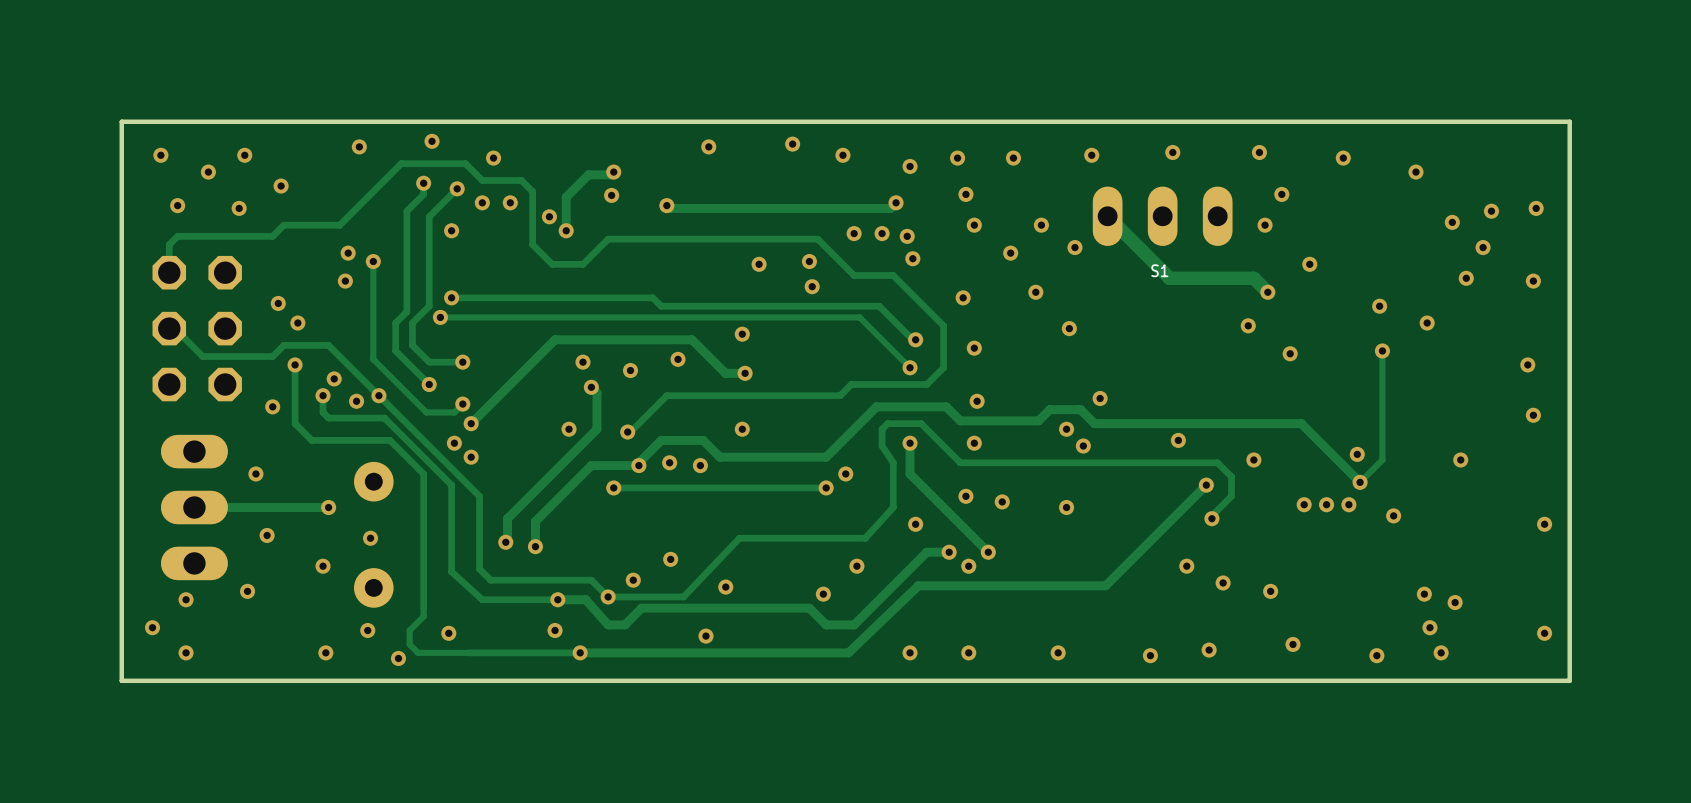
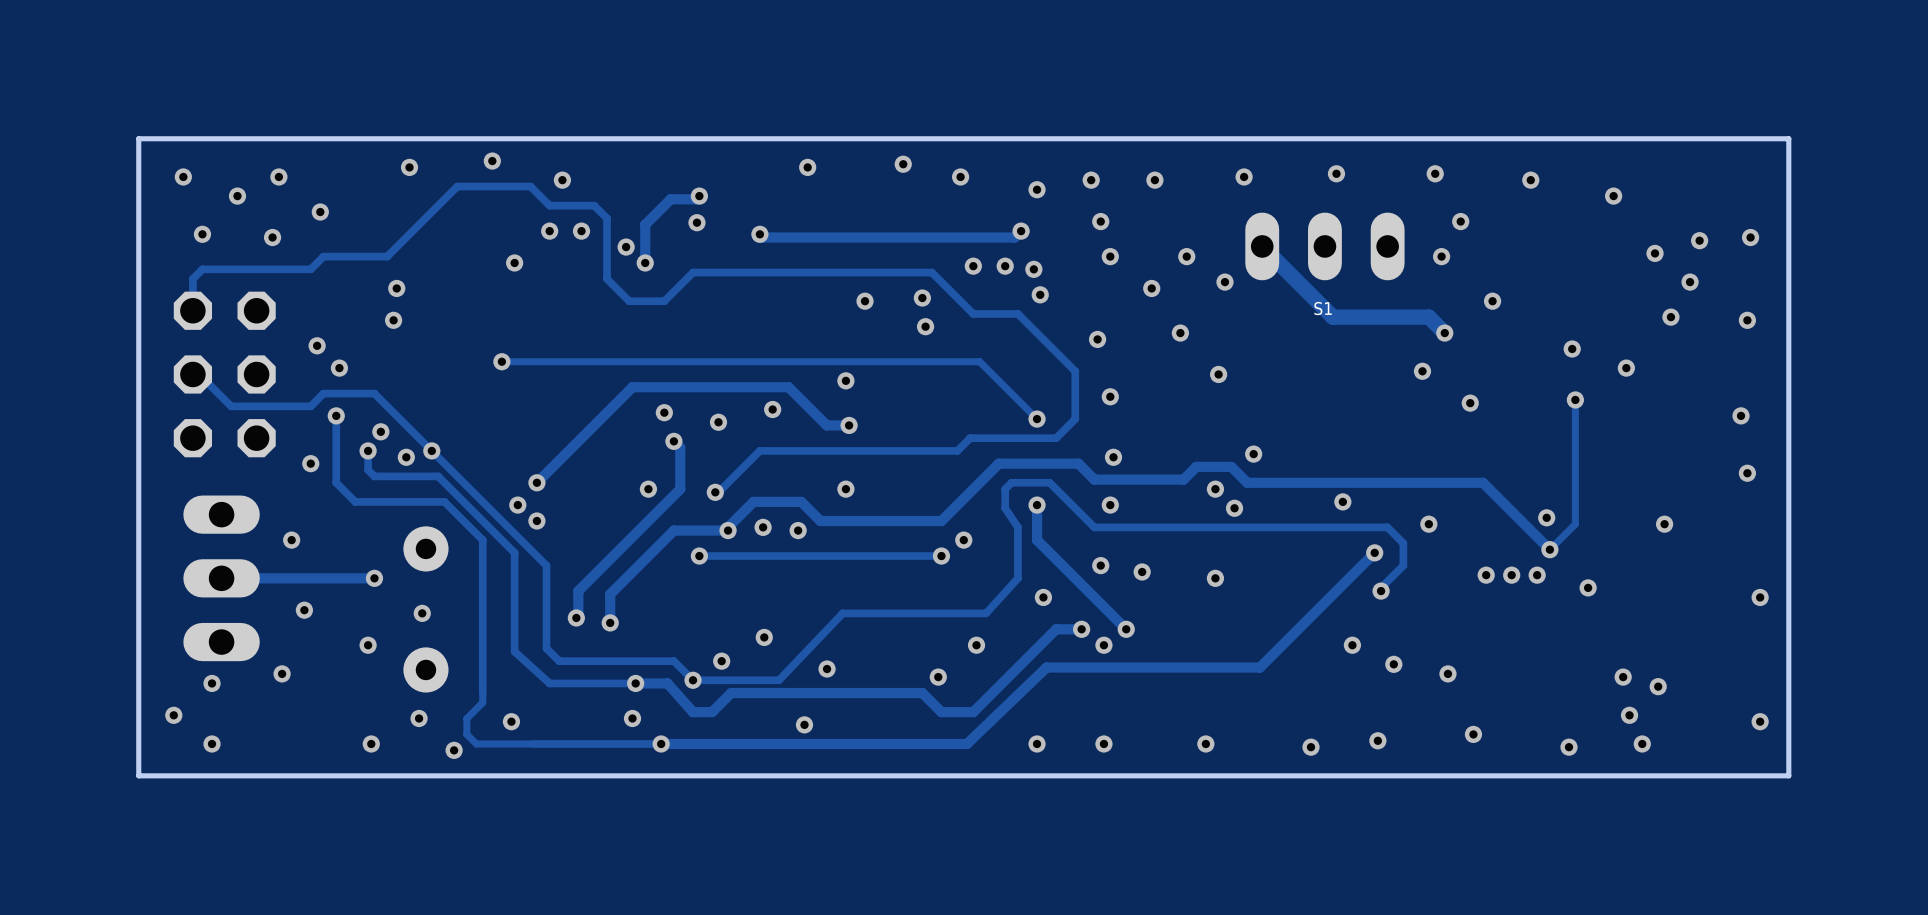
track: (423, 183) (423, 194) (406, 211) (406, 311) (395, 323) (395, 350) (429, 384) -> none
via: (423, 183) -> none
track: (457, 188) (429, 216) (429, 306) (412, 323) (412, 345) (429, 362) (462, 362) -> none
via: (457, 188) -> none
track: (373, 261) (373, 359) (426, 412) (454, 412) (462, 404) -> none
via: (373, 261) -> none
track: (451, 297) (652, 297) (661, 306) (879, 306) (912, 339) (915, 339) -> none
via: (451, 297) -> none
via: (915, 339) -> none
via: (462, 362) -> none
via: (429, 384) -> none
via: (462, 404) -> none

